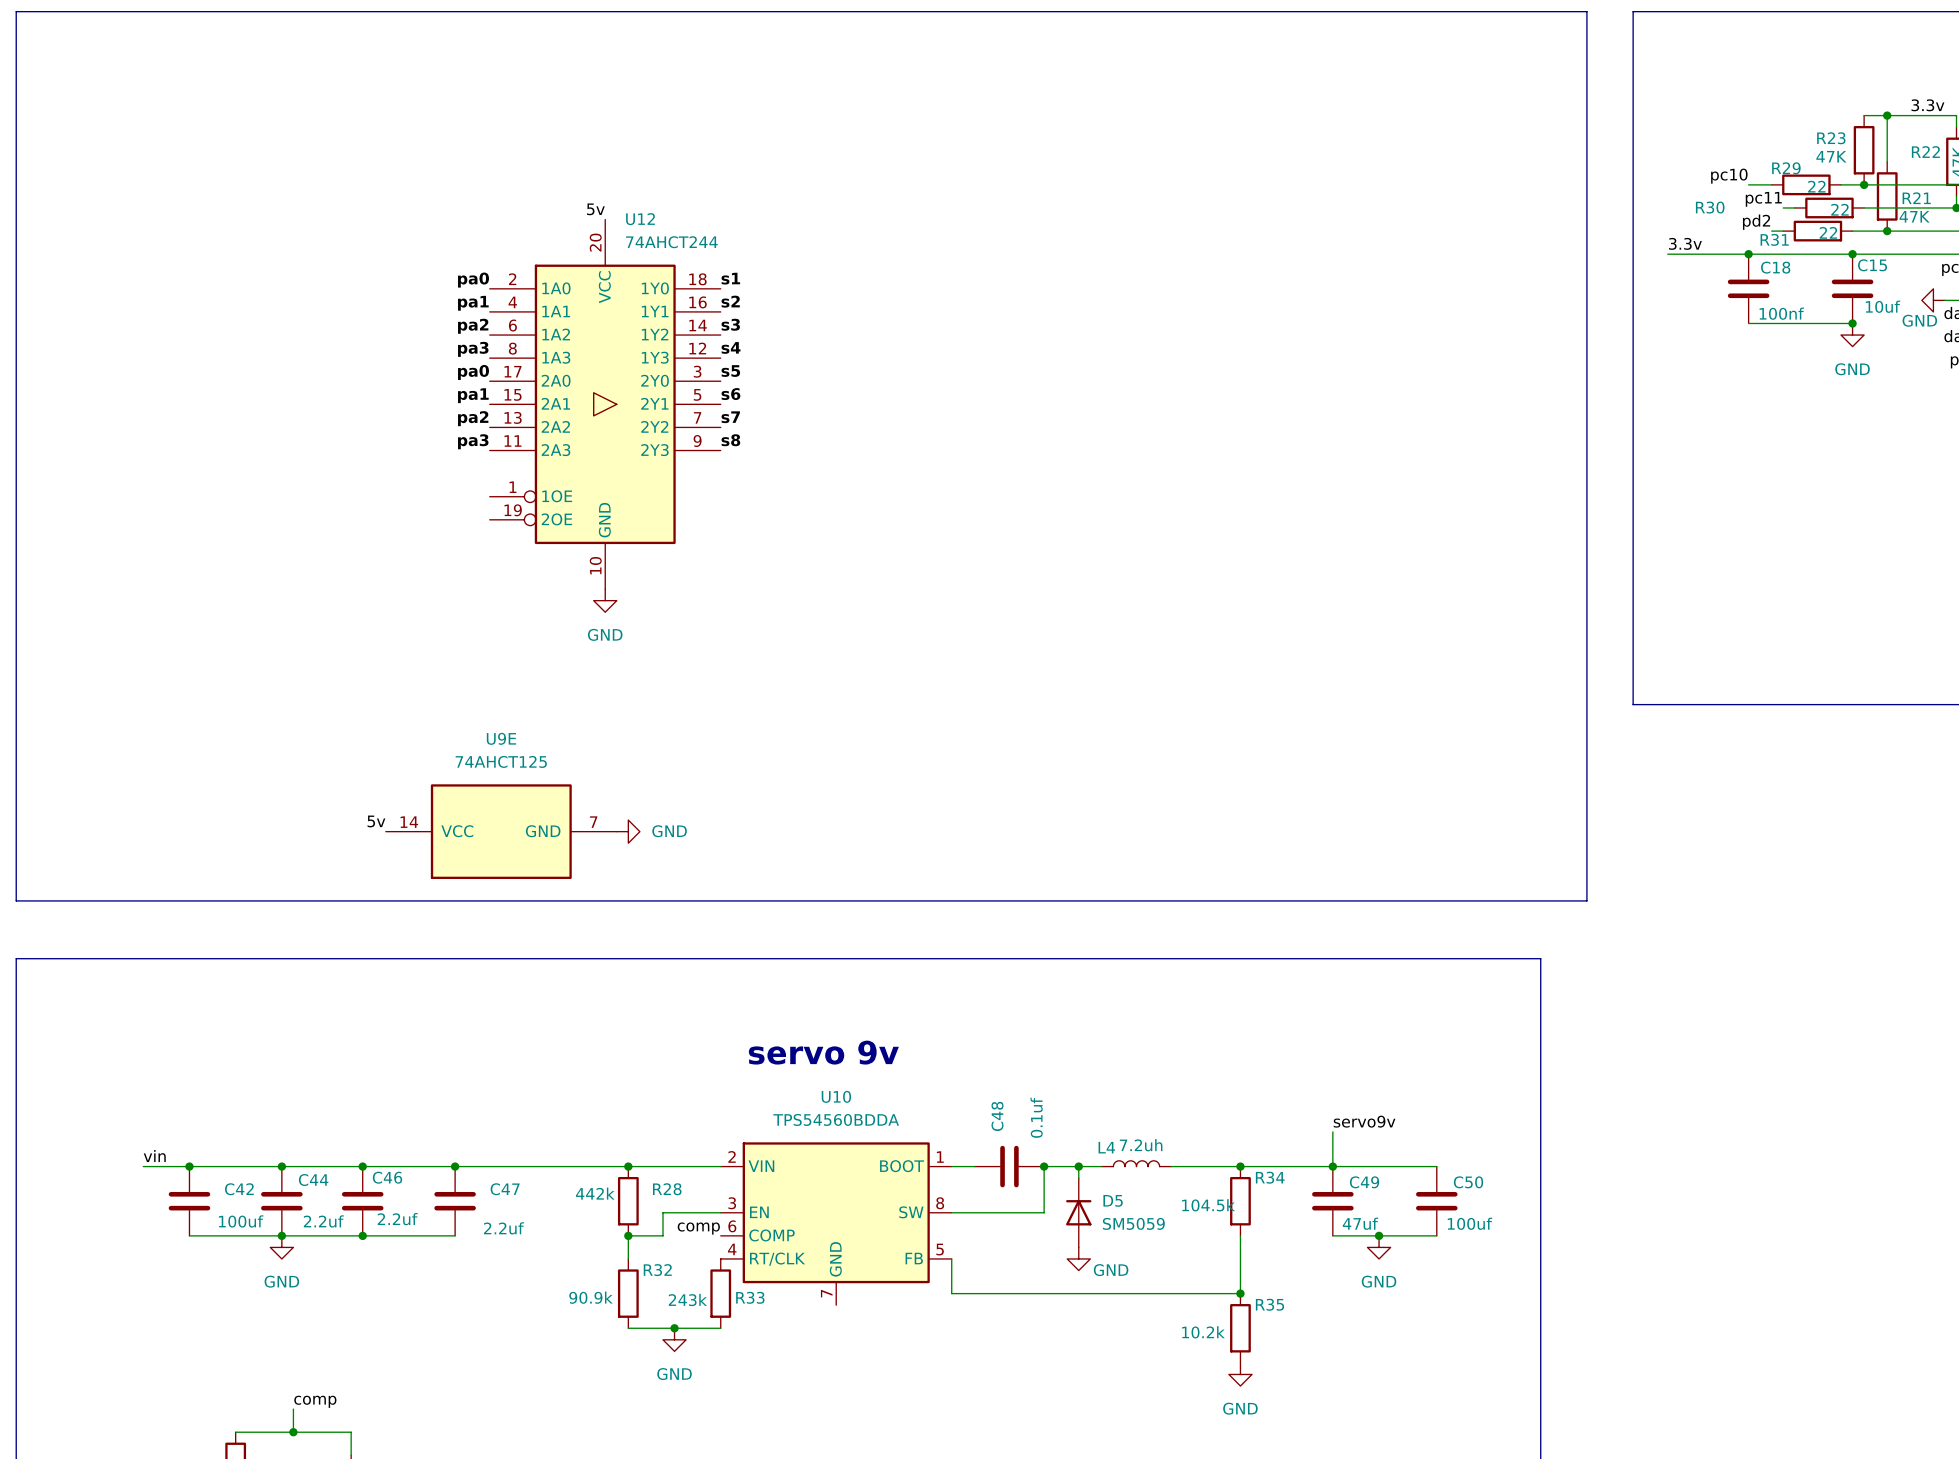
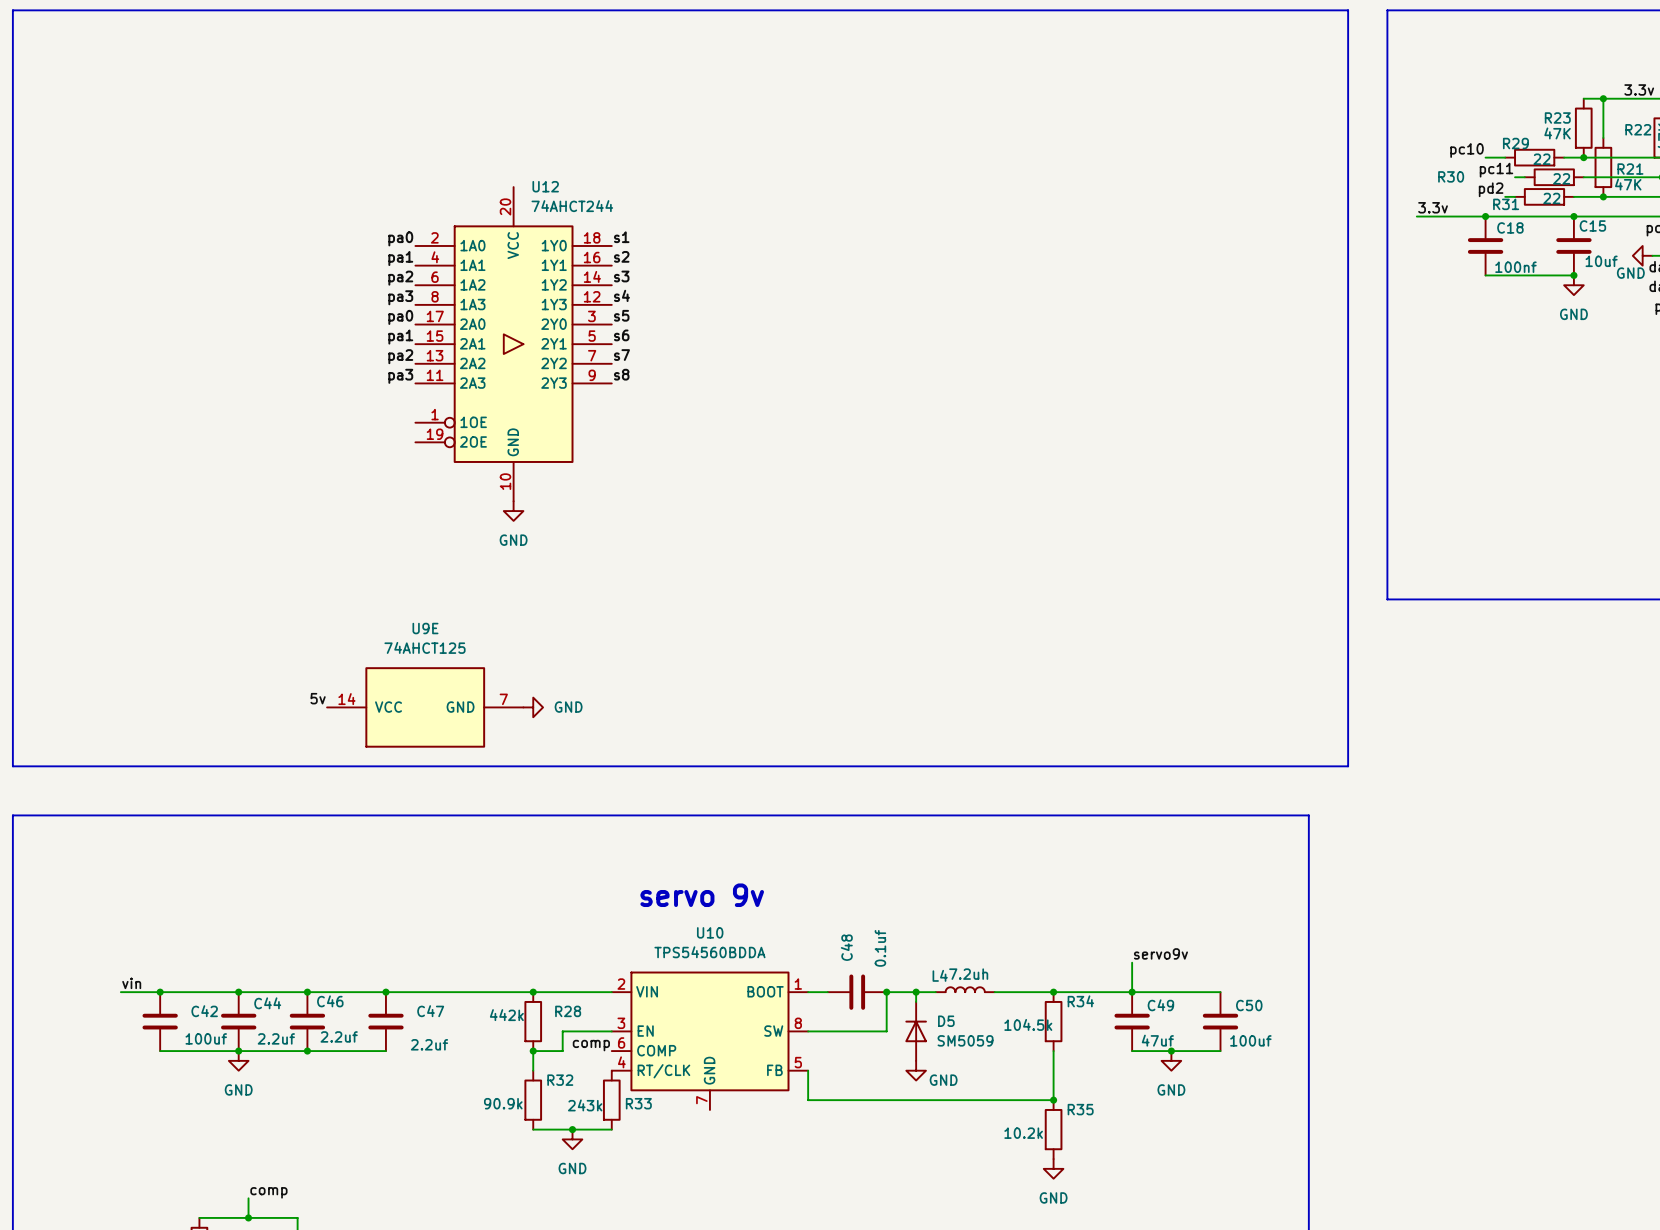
label: 5v (595, 209) -> none

